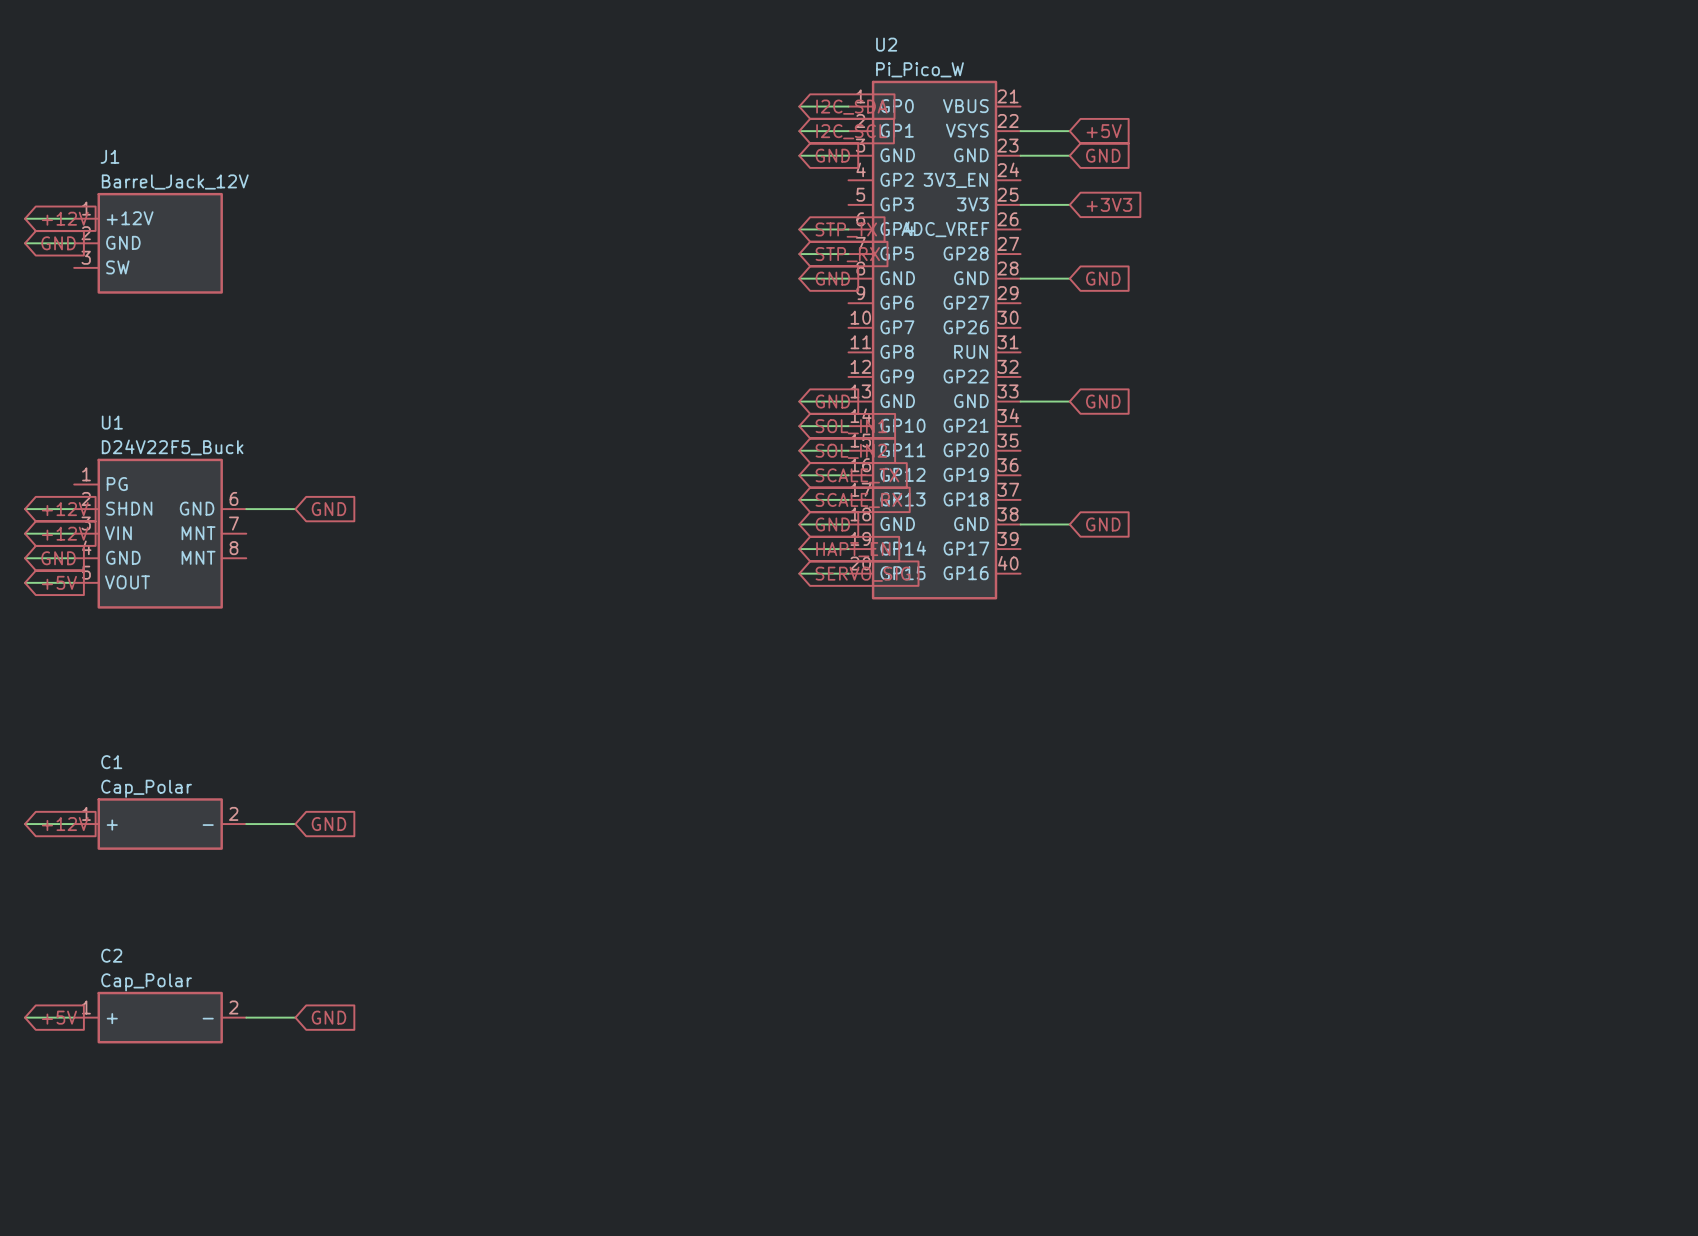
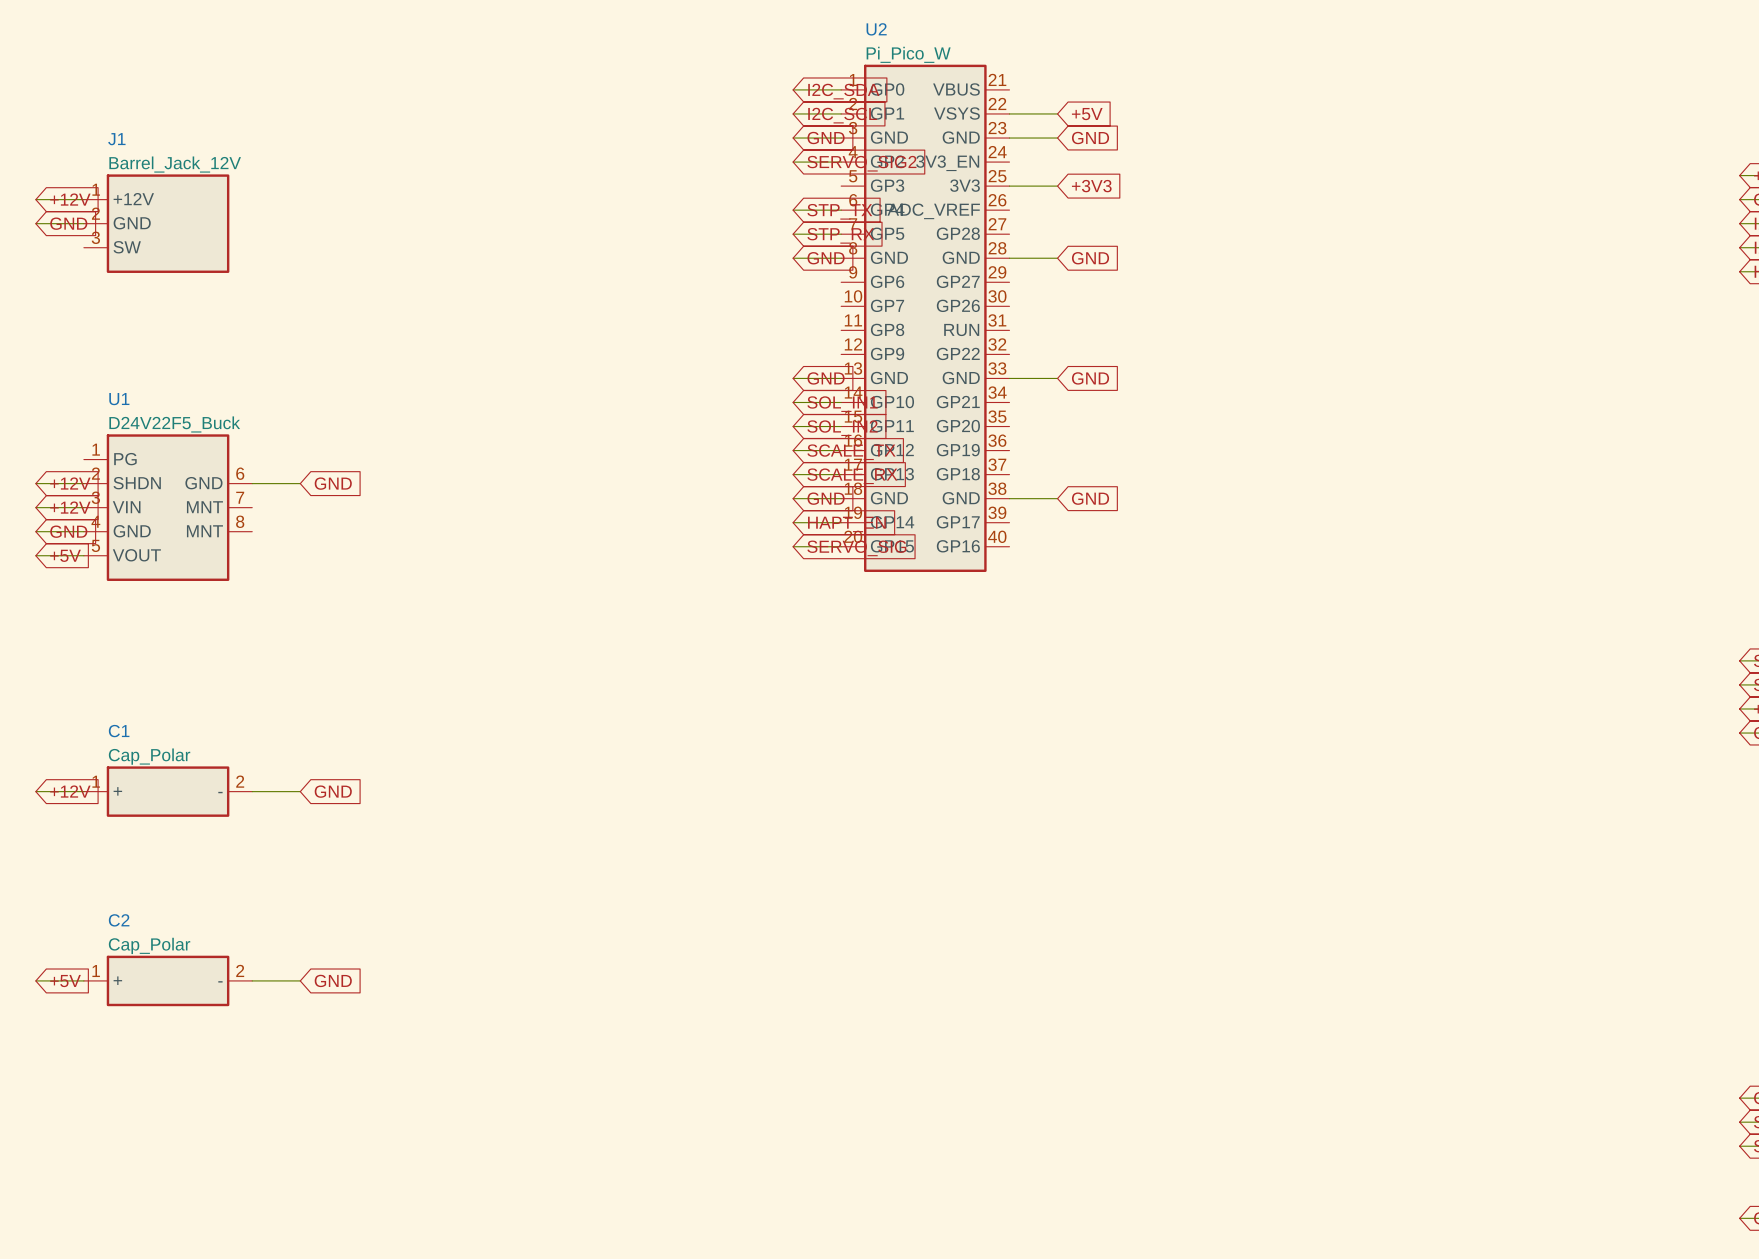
wire: none -> (793, 162) (841, 162)
global label: none -> SERVO_SIG2 (861, 163)

